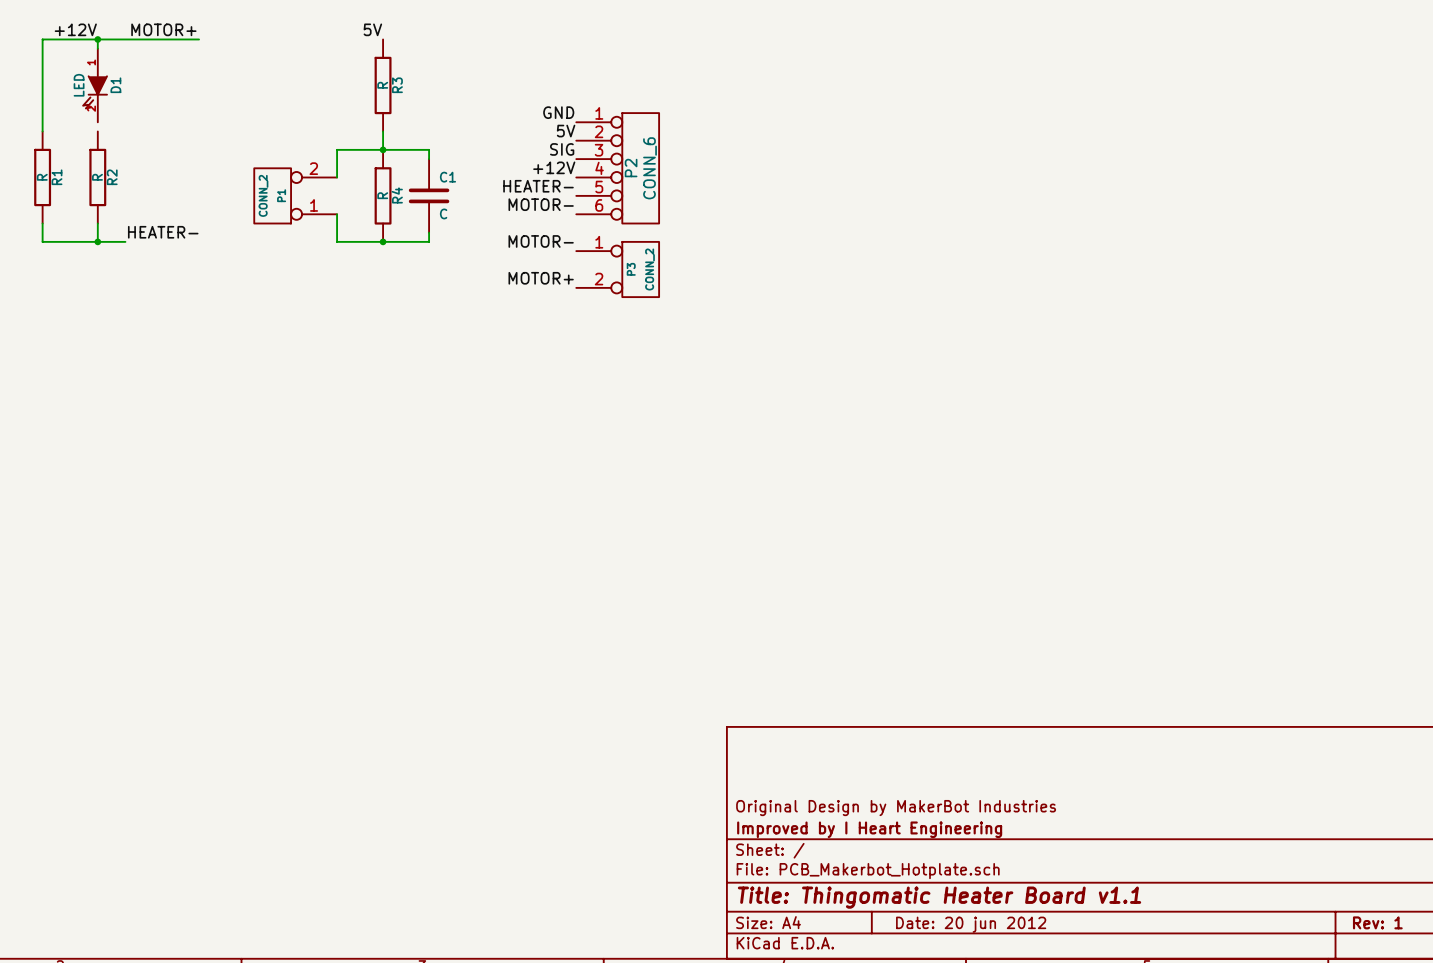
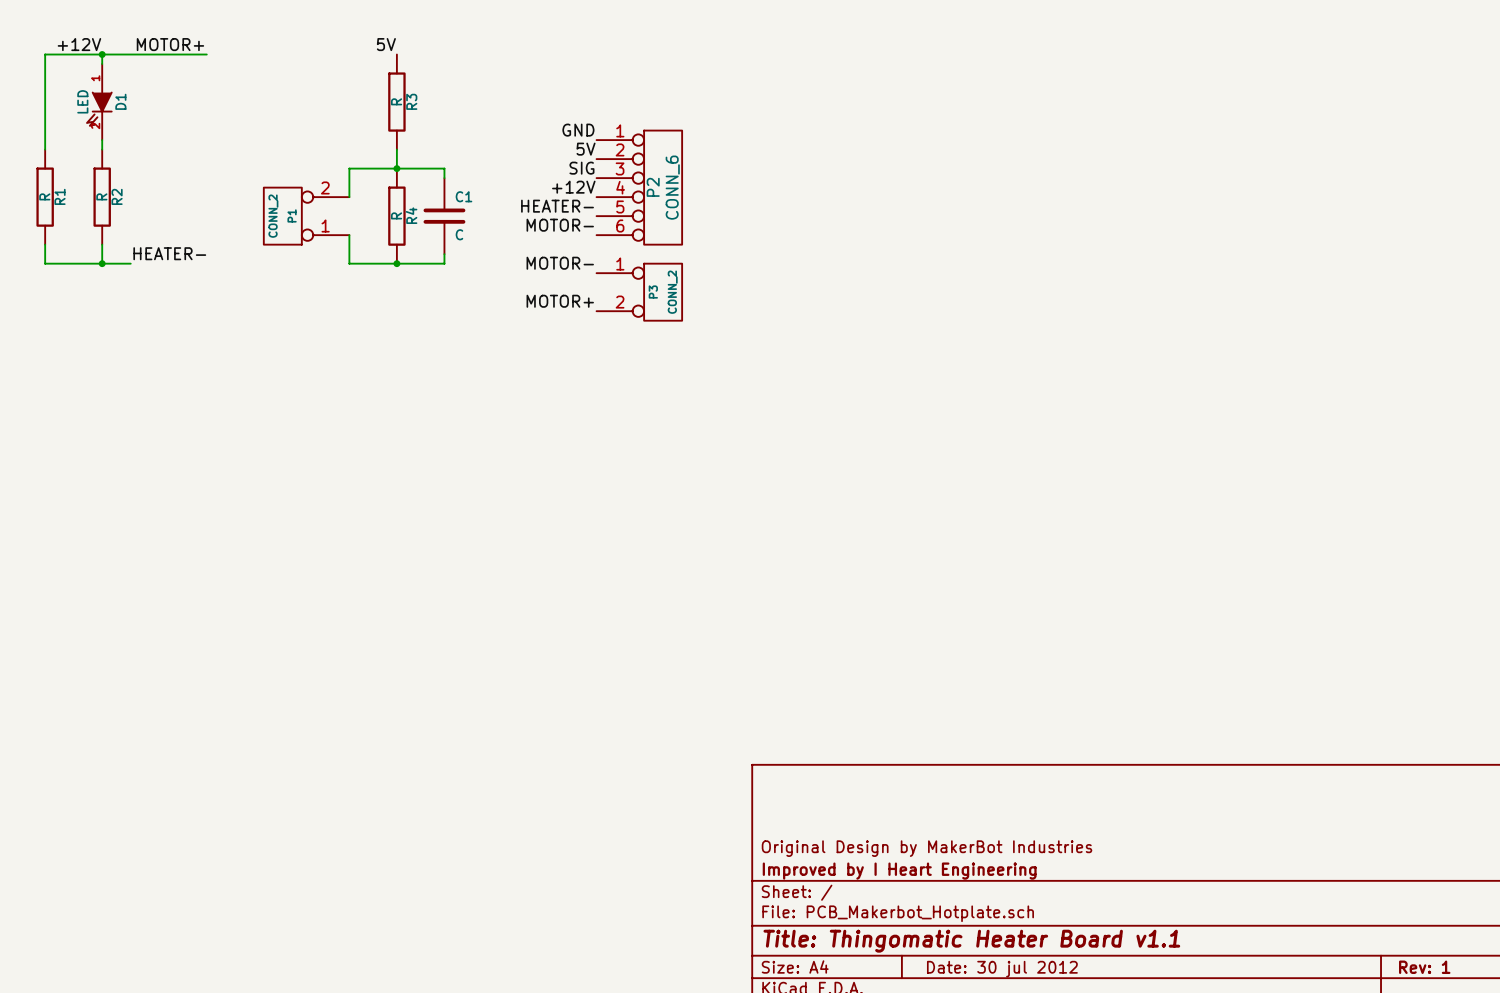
wire: none -> (102, 140) (102, 149)
title block: Date: 20 jun 2012 (971, 924) -> Date: 30 jul 2012 (1002, 969)

